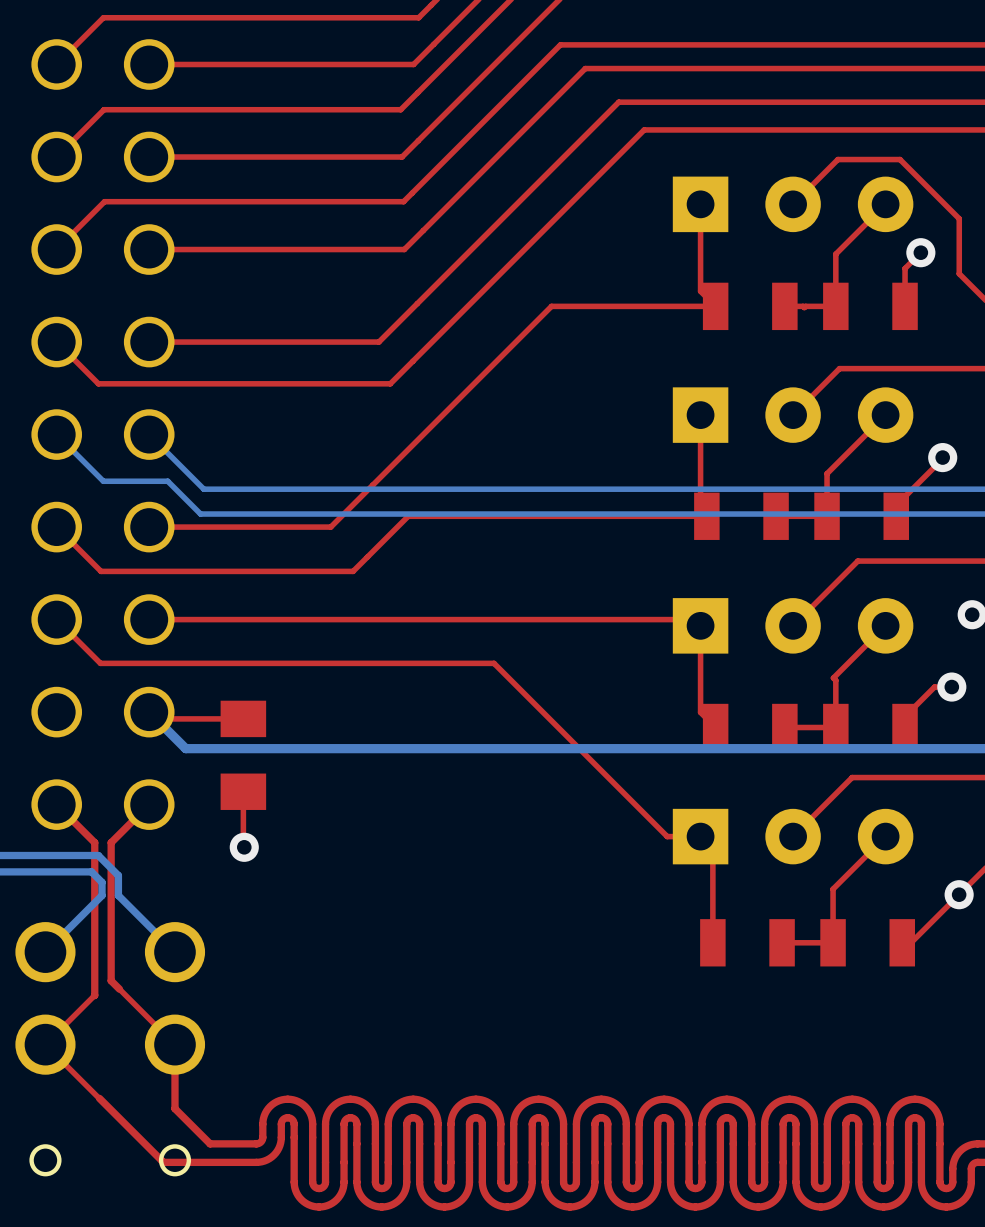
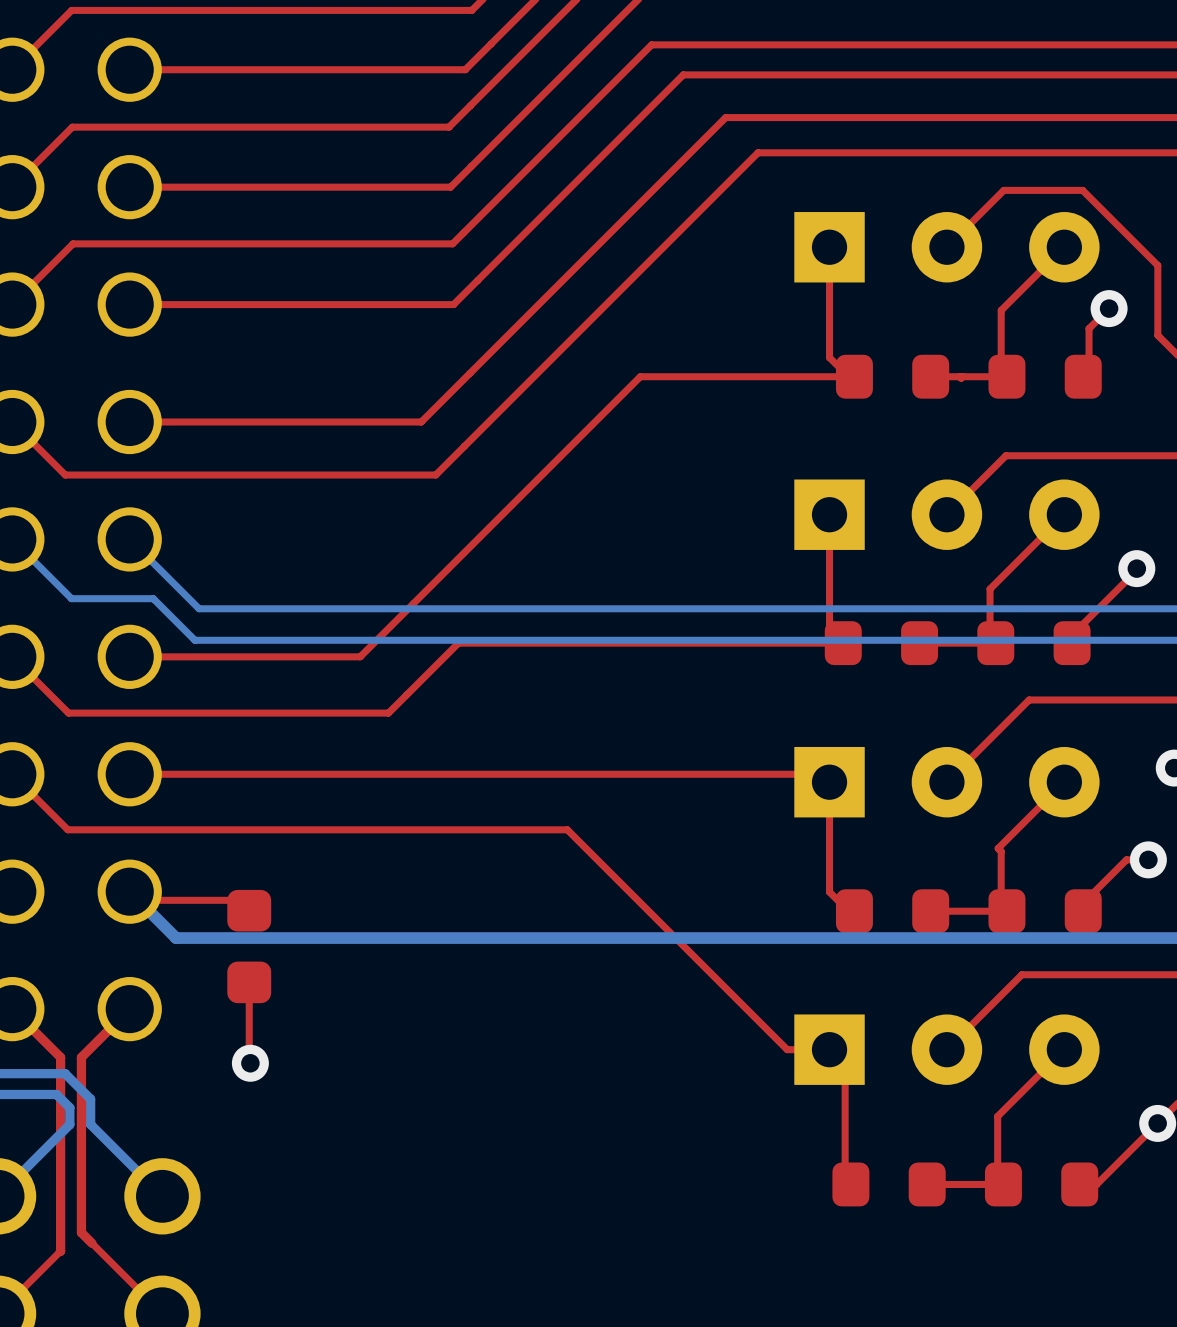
part footprint: [702, 282, 798, 331] -> [835, 354, 950, 399]
part footprint: [823, 282, 918, 331] -> [988, 354, 1102, 399]
part footprint: [694, 492, 789, 540] -> [824, 621, 939, 666]
part footprint: [814, 492, 909, 540] -> [977, 621, 1091, 666]
part footprint: [220, 700, 267, 810] -> [227, 889, 272, 1004]
part footprint: [702, 703, 798, 752] -> [835, 889, 950, 934]
part footprint: [823, 703, 918, 752] -> [988, 889, 1102, 934]
part footprint: [700, 919, 795, 967] -> [832, 1162, 946, 1207]
part footprint: [820, 919, 916, 967] -> [984, 1162, 1099, 1207]

